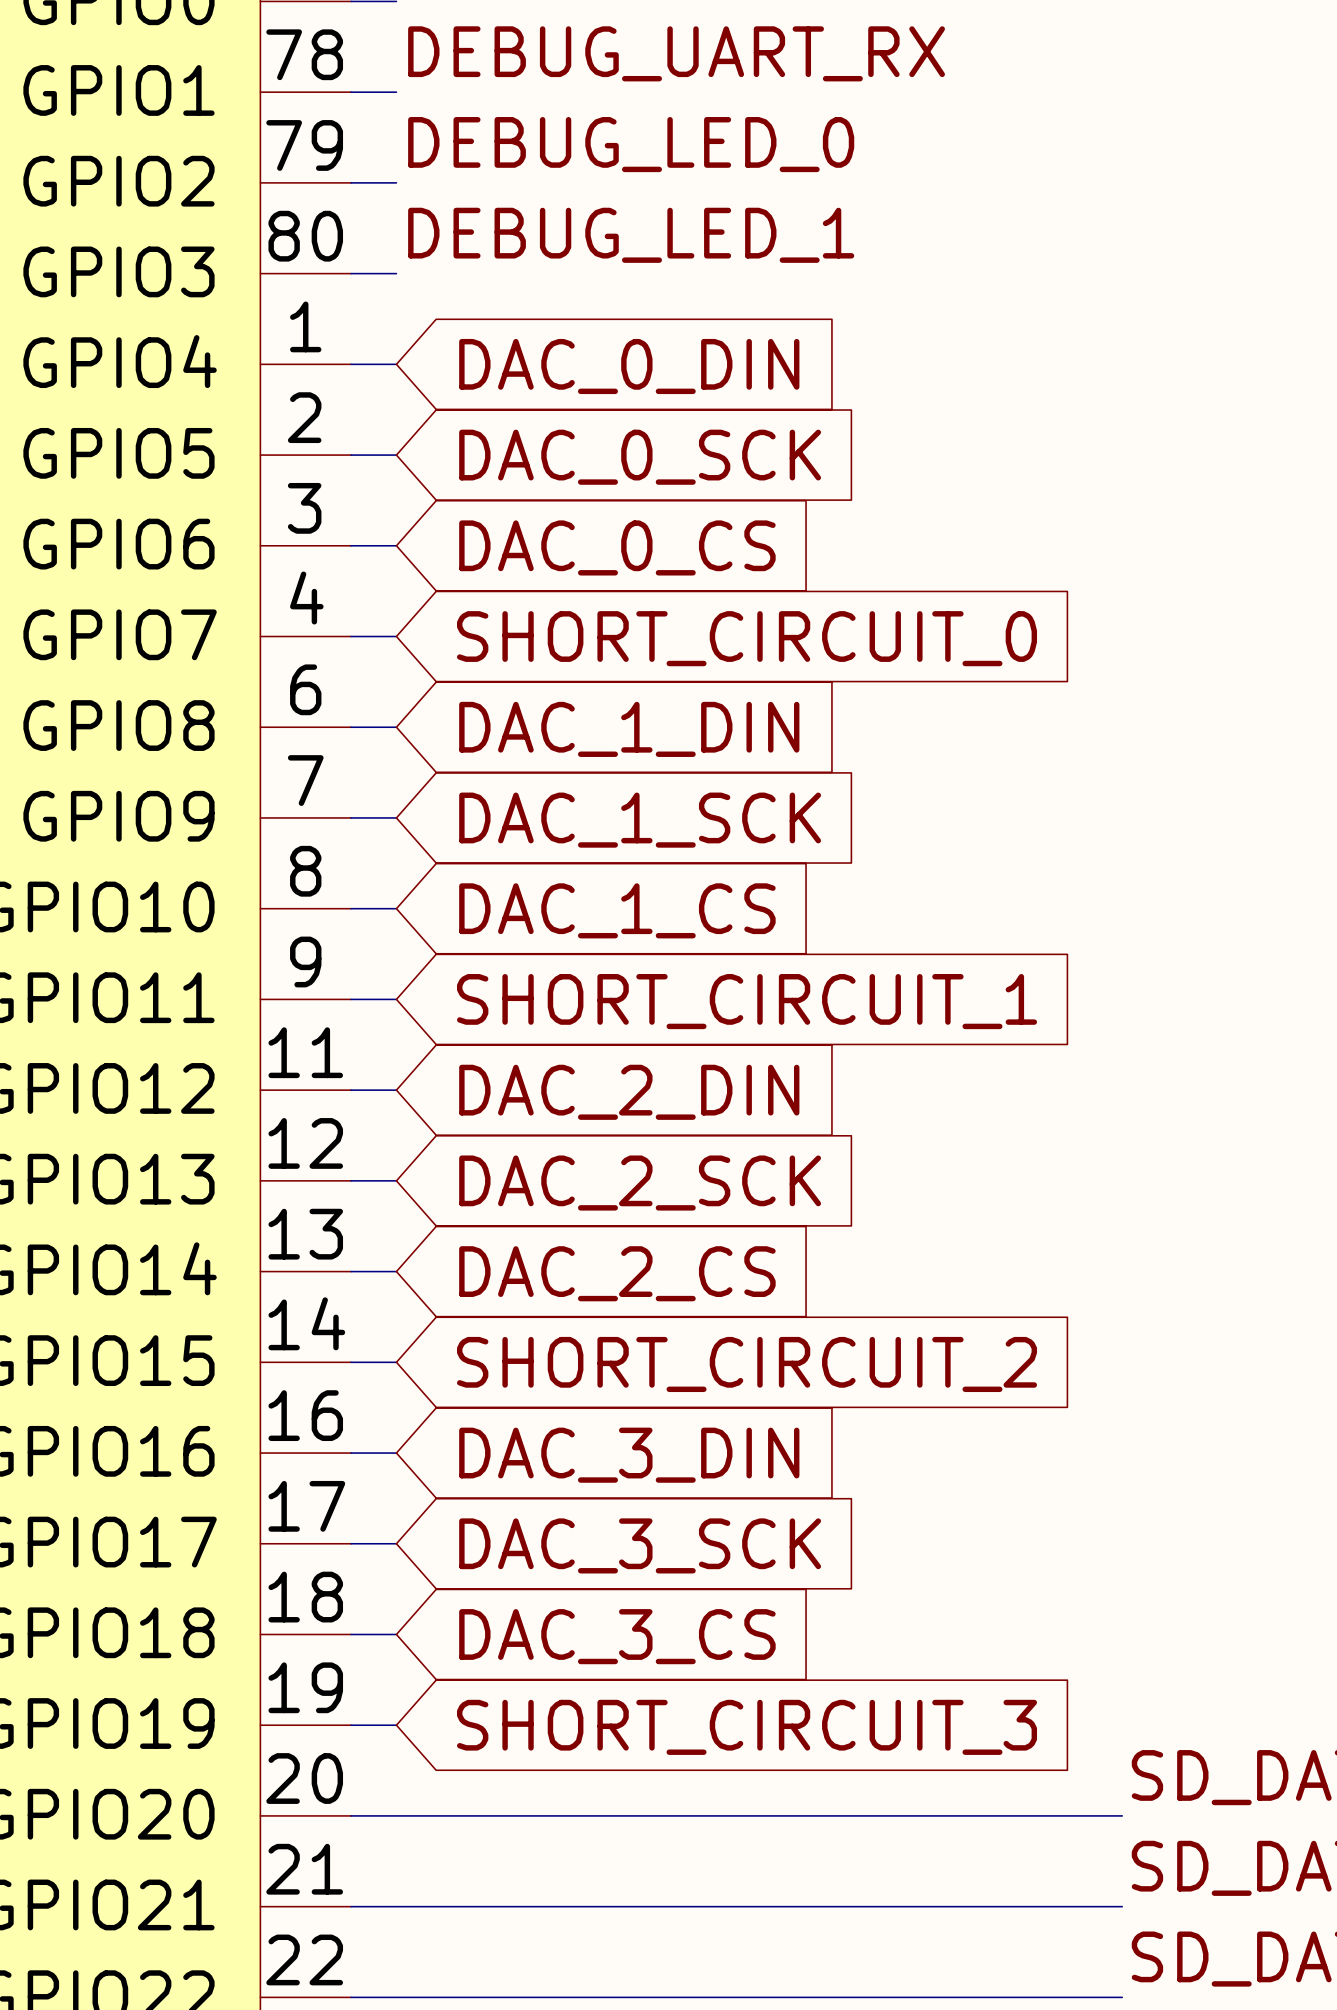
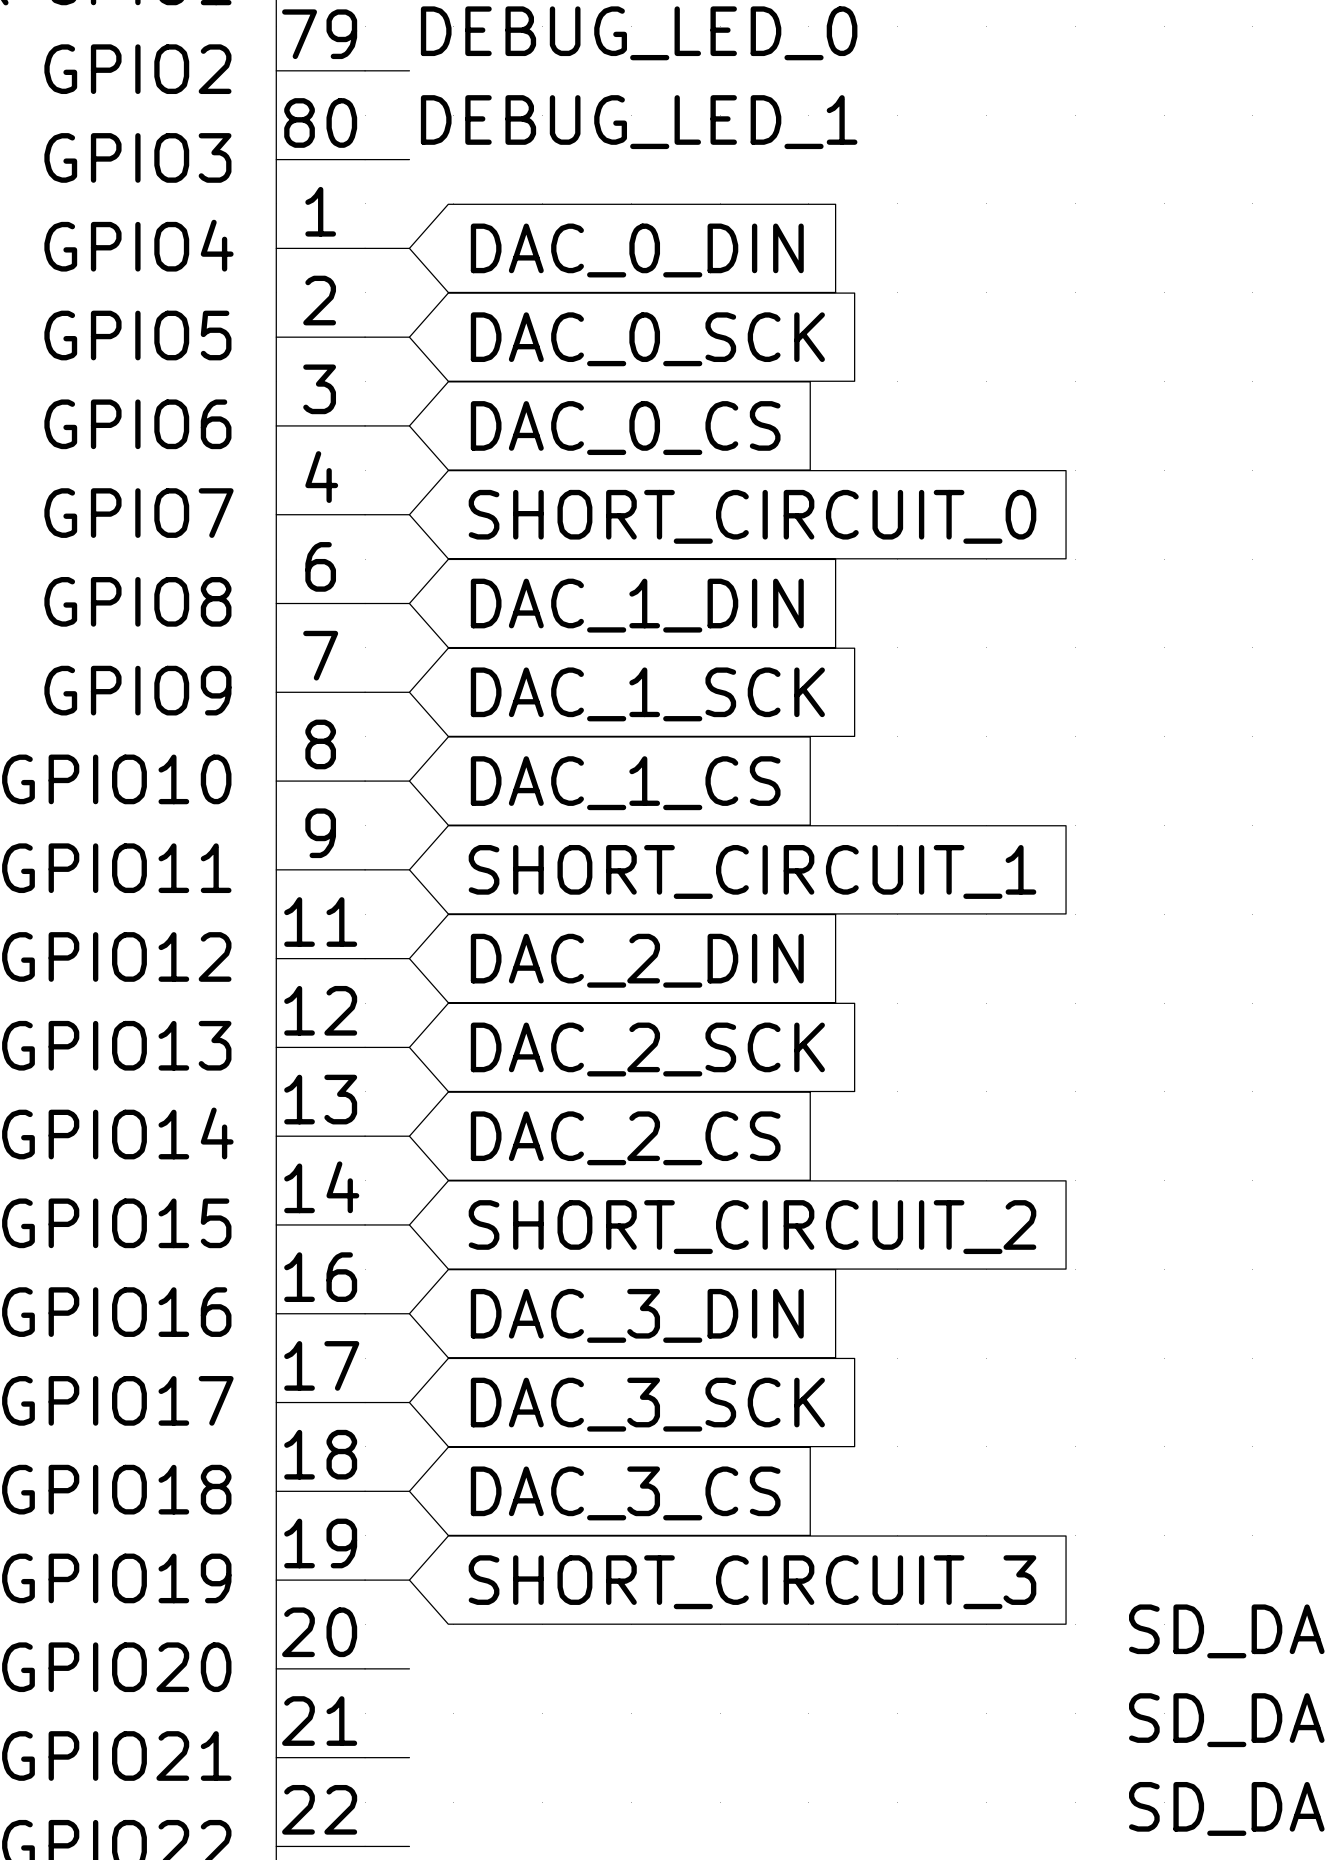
wire: (396, 1815) (1122, 1815) -> none
wire: (396, 1906) (1122, 1906) -> none
wire: (396, 1997) (1122, 1997) -> none

